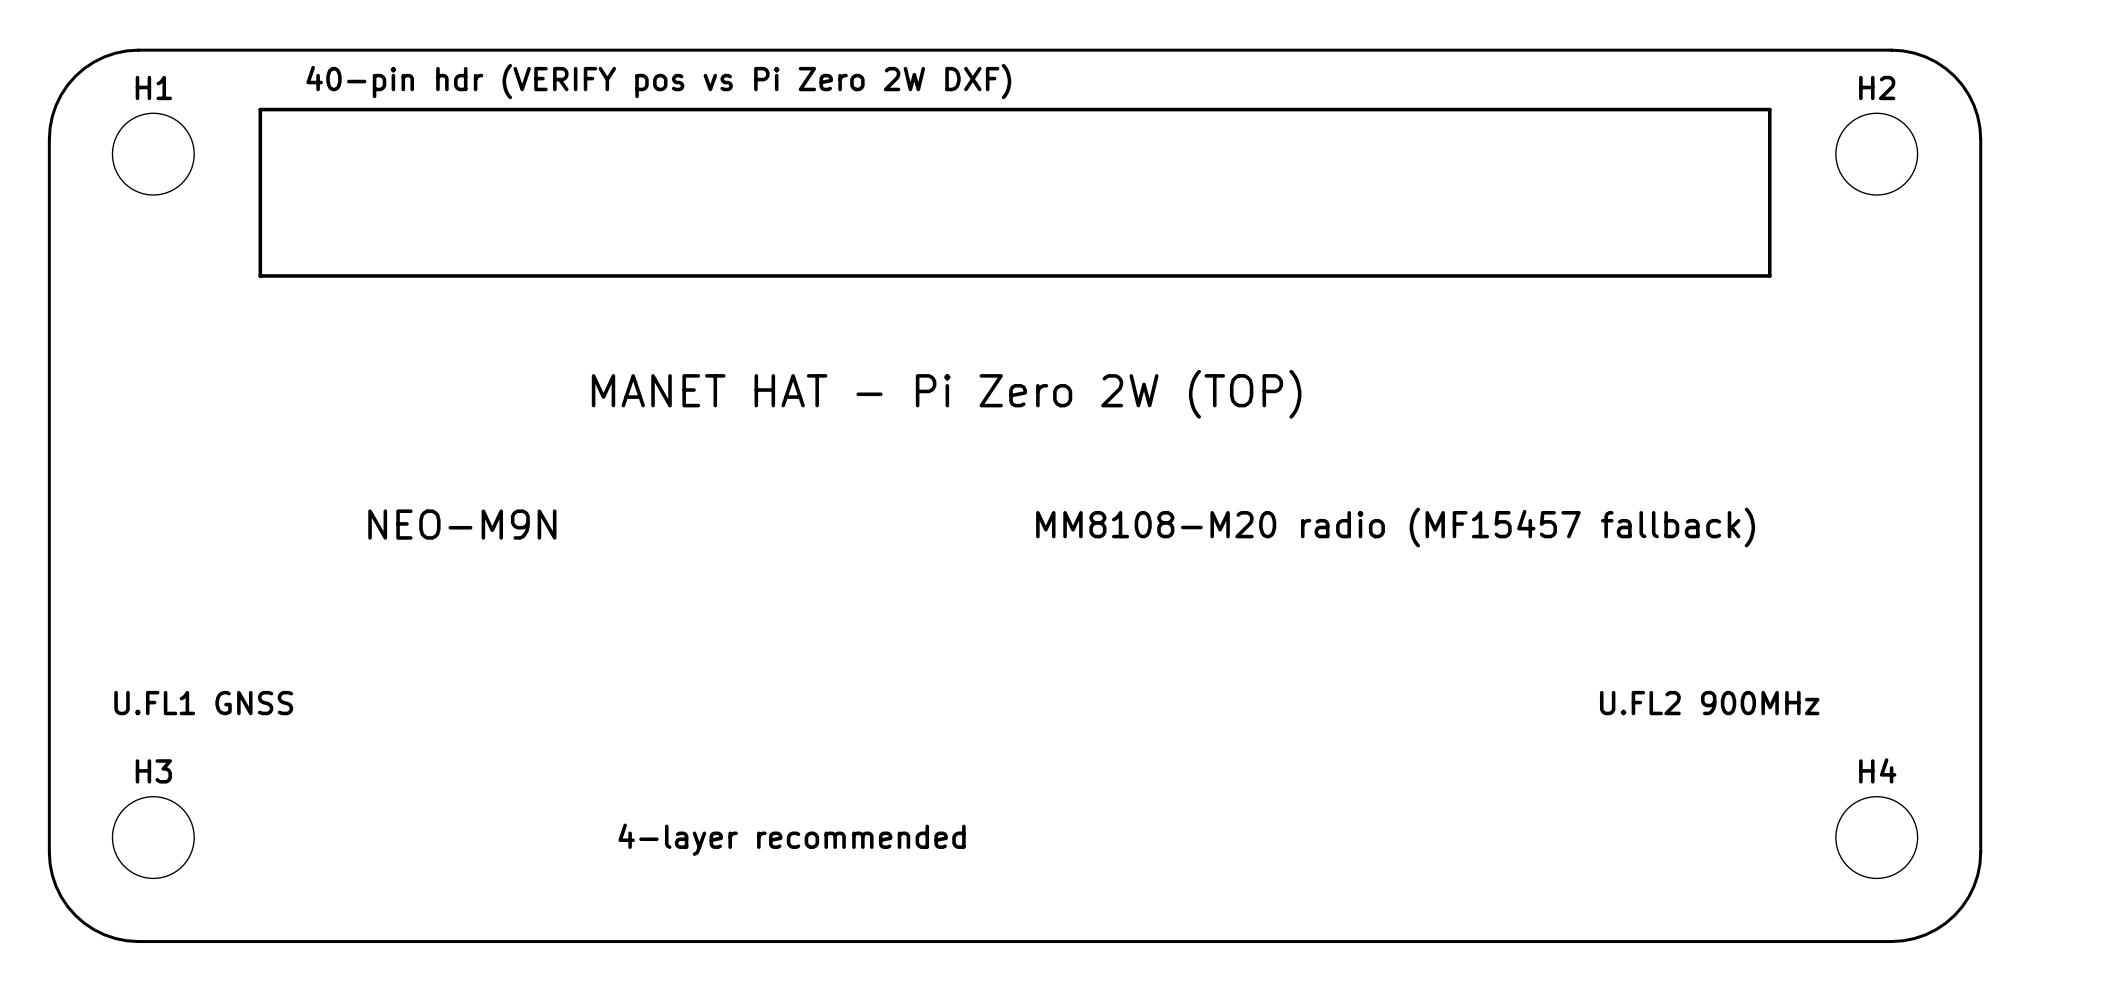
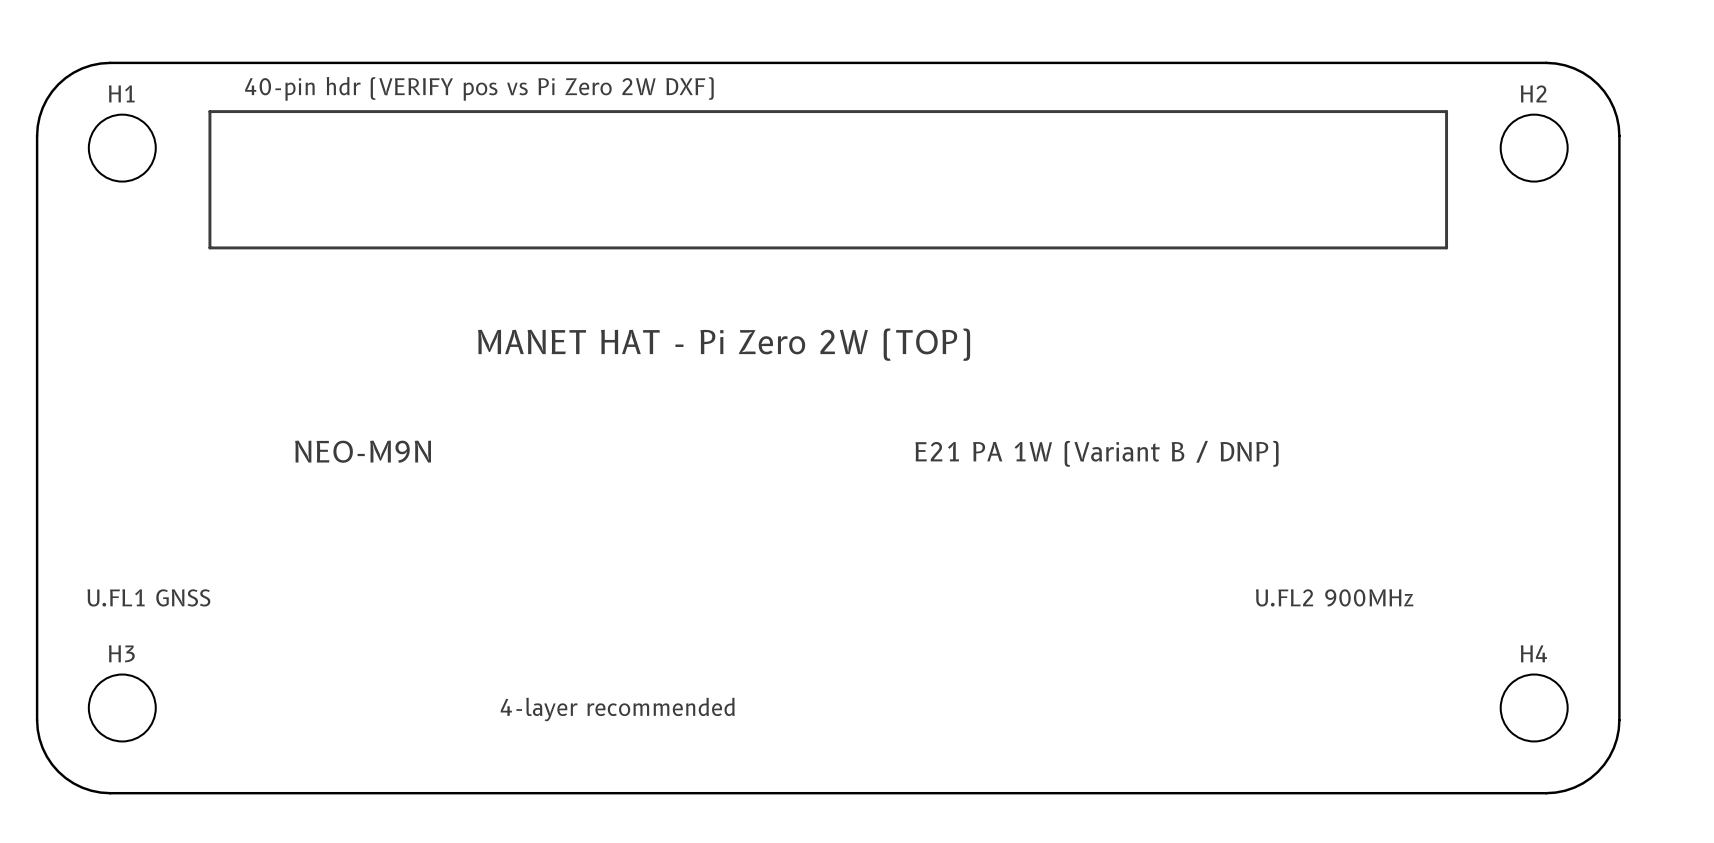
text: none -> E21 PA 1W (Variant B / DNP) (1097, 453)
text: MM8108-M20 radio (MF15457 fallback) (1395, 527) -> none
text position: U.FL2 900MHz (1709, 703) -> U.FL2 900MHz (1334, 597)

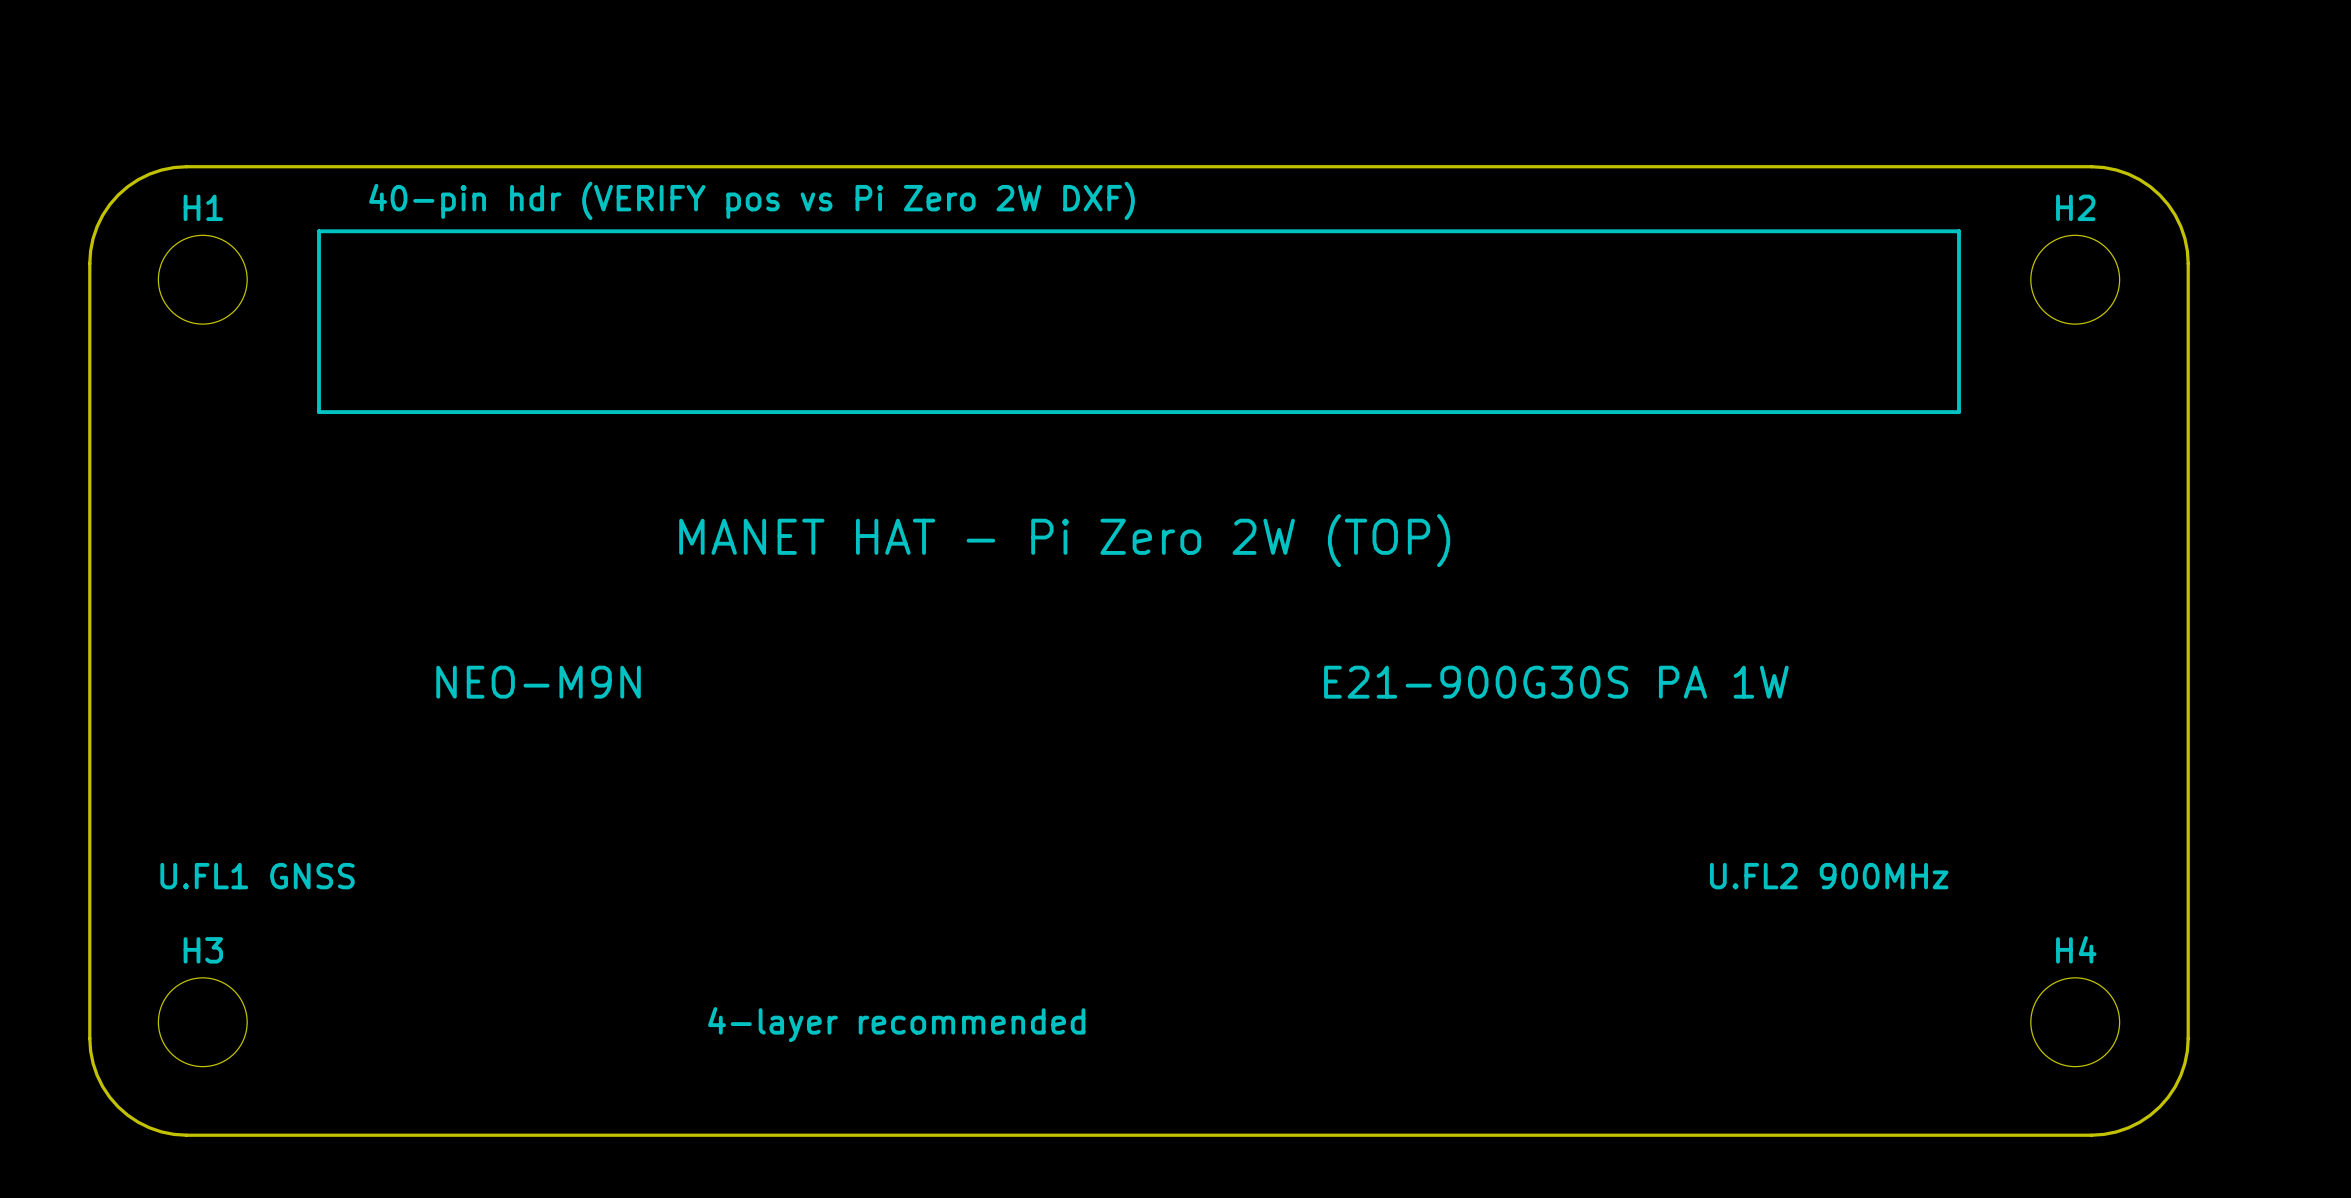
text: none -> E21-900G30S PA 1W (1556, 682)
text: E21 PA 1W (Variant B / DNP) (1097, 453) -> none

